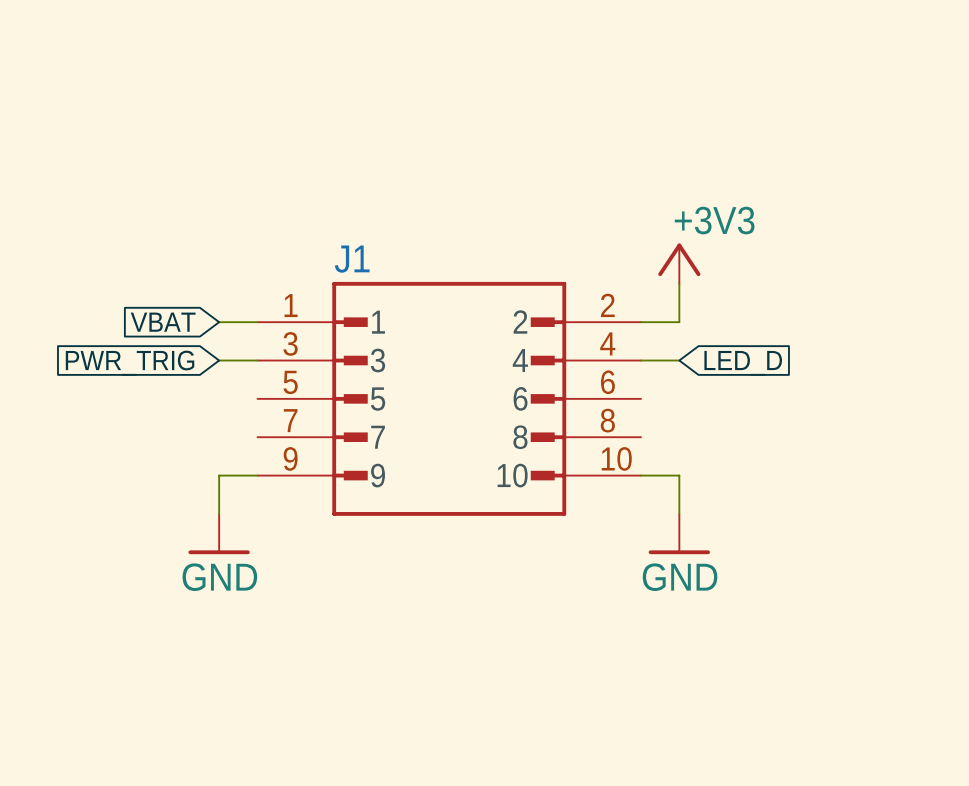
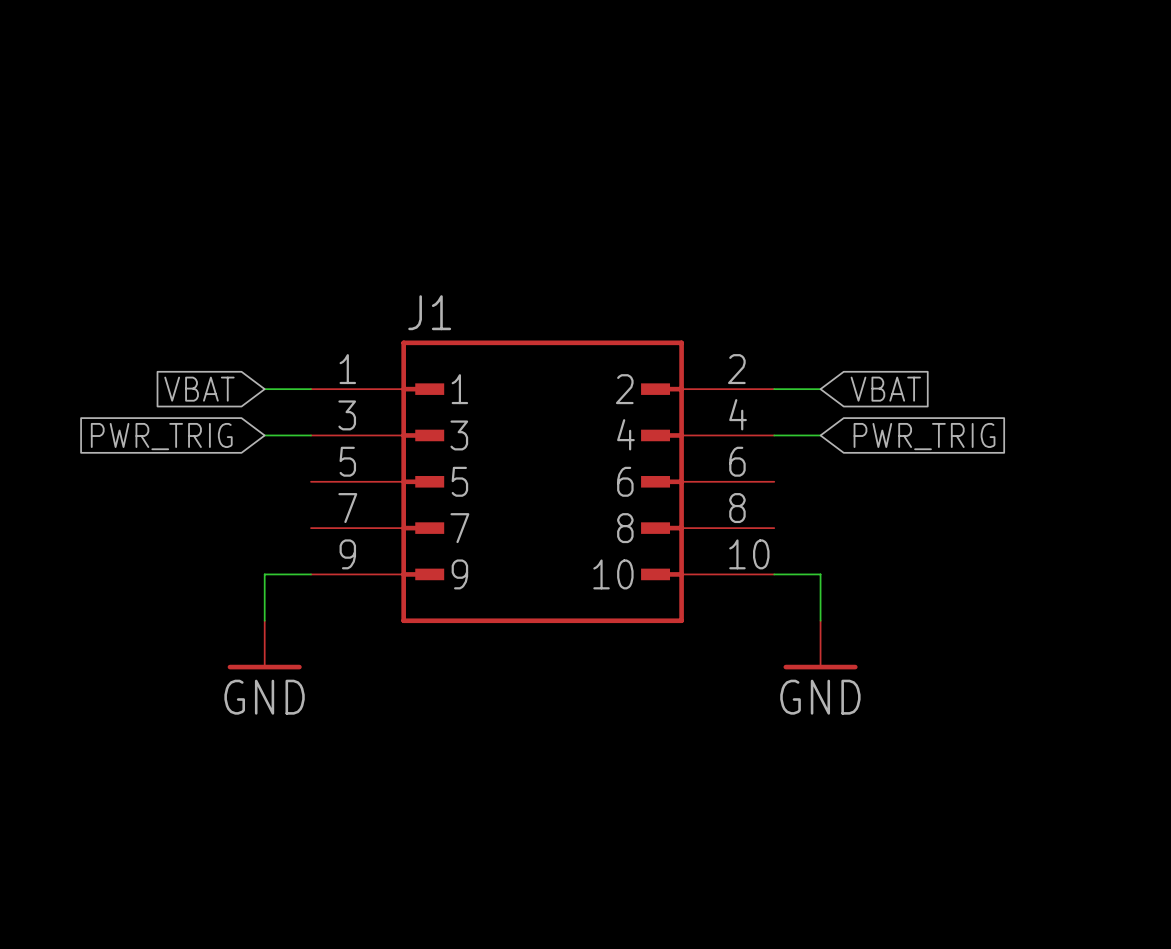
power symbol: +3V3 (679, 263) -> none
wire: (679, 283) (679, 322) -> none
global label: none -> VBAT (885, 389)
global label: LED_D (743, 363) -> PWR_TRIG (924, 436)

